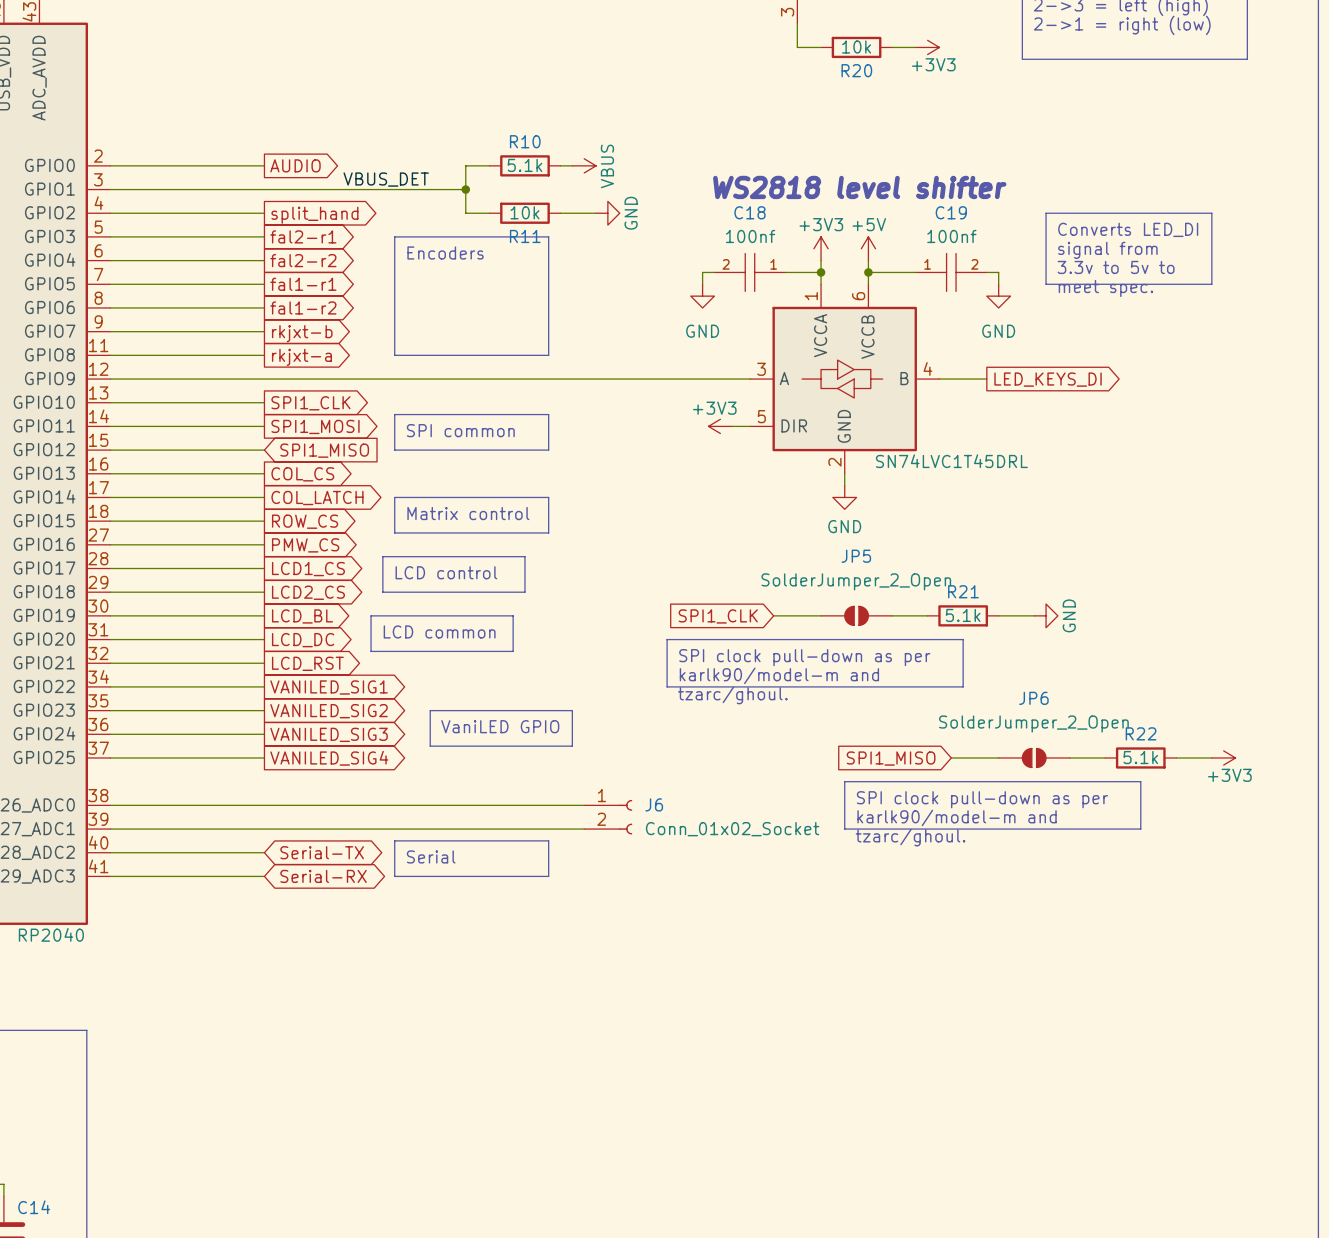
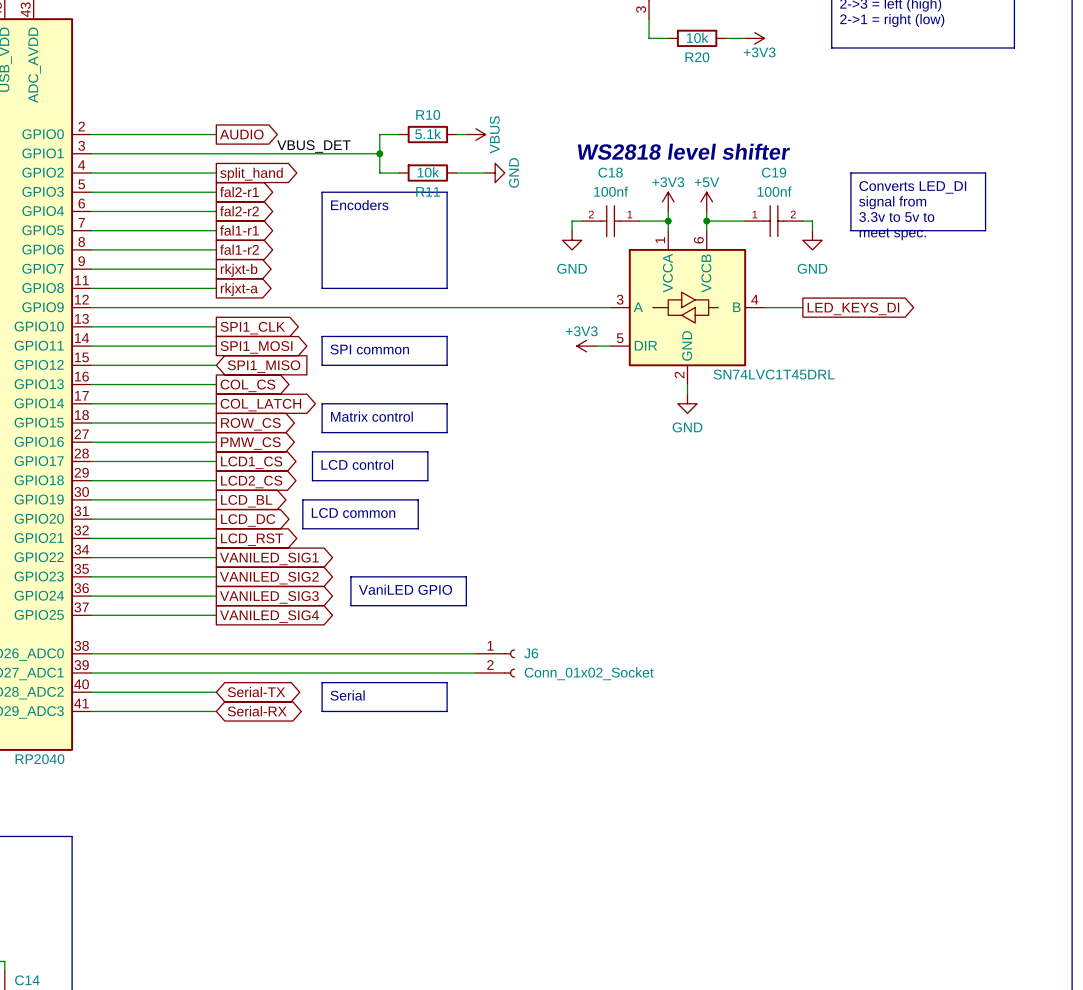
wire: (773, 615) (821, 615) -> none
JP5: SolderJumper_2_Open (856, 615) -> none
wire: (892, 615) (927, 615) -> none
R21: 5.1k (963, 615) -> none
wire: (998, 615) (1034, 615) -> none
power symbol: GND (1046, 615) -> none
global label: SPI1_CLK (718, 616) -> none
line: (667, 639) (963, 639) (963, 686) (667, 686) (667, 639) -> none
text: SPI clock pull-down as per (804, 657) -> none
text: karlk90/model-m and (779, 675) -> none
text: tzarc/ghoul. (732, 695) -> none
wire: (951, 757) (998, 757) -> none
JP6: SolderJumper_2_Open (1034, 757) -> none
wire: (1069, 757) (1105, 757) -> none
R22: 5.1k (1140, 757) -> none
wire: (1176, 757) (1211, 757) -> none
power symbol: +3V3 (1223, 757) -> none
global label: SPI1_MISO (891, 758) -> none
line: (844, 781) (1140, 781) (1140, 829) (844, 829) (844, 781) -> none
text: SPI clock pull-down as per (982, 799) -> none
text: karlk90/model-m and (957, 817) -> none
text: tzarc/ghoul. (910, 837) -> none

